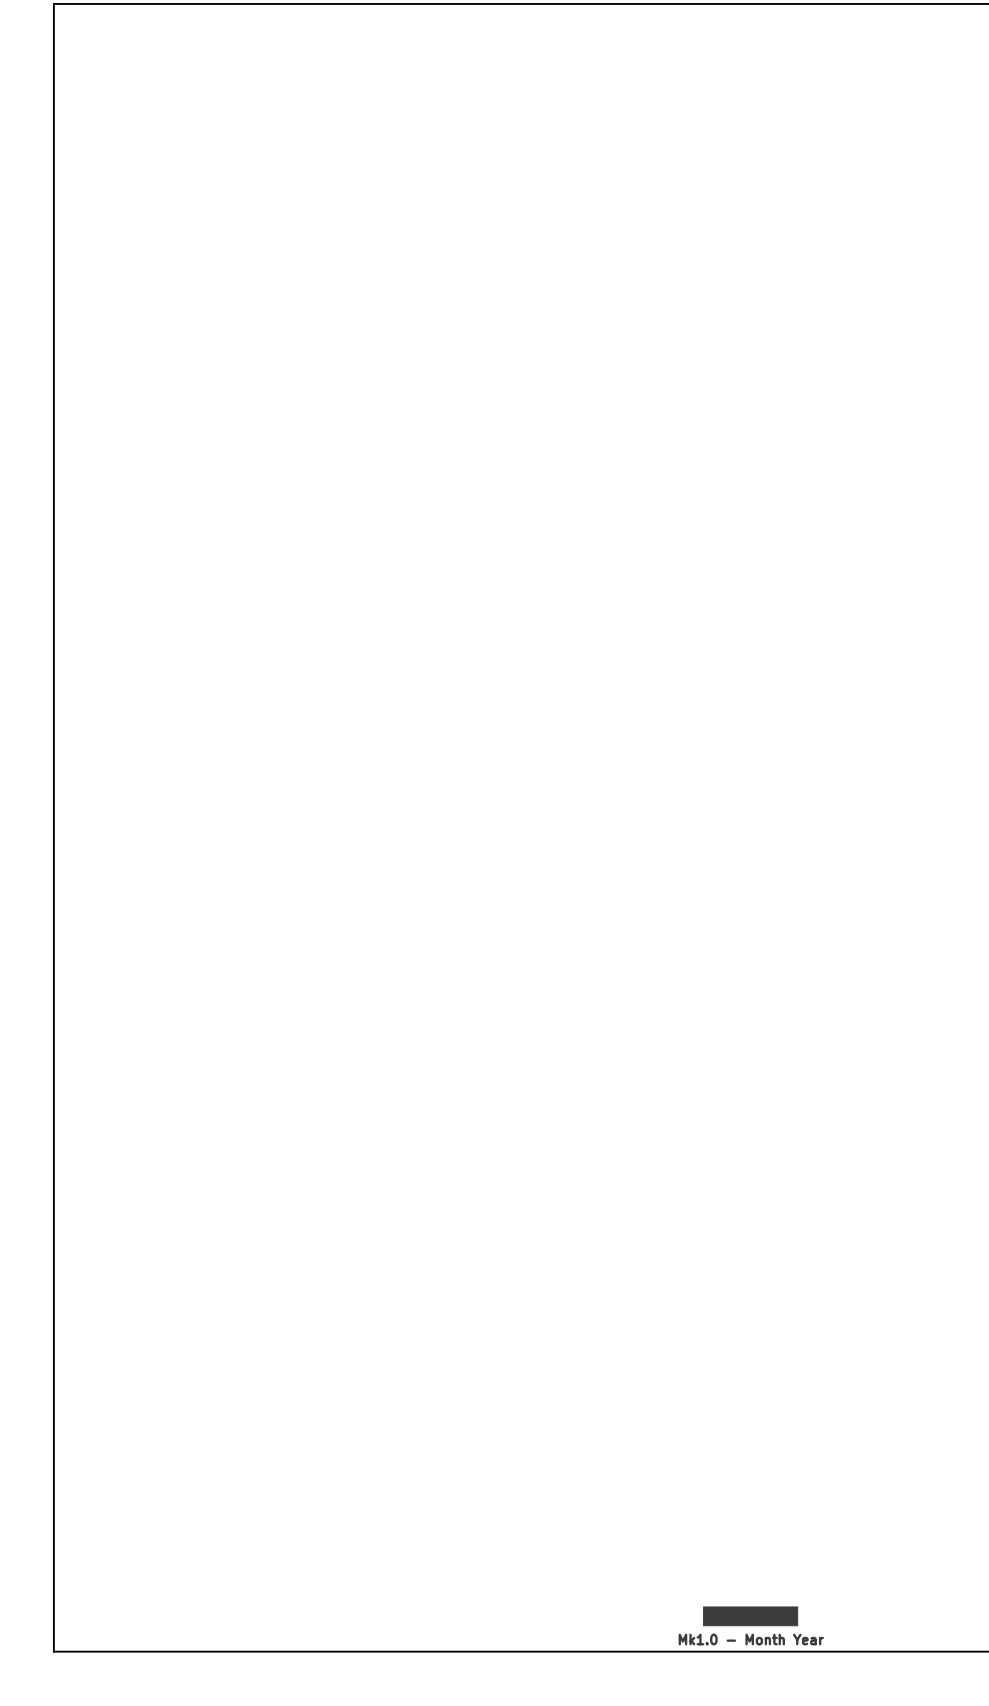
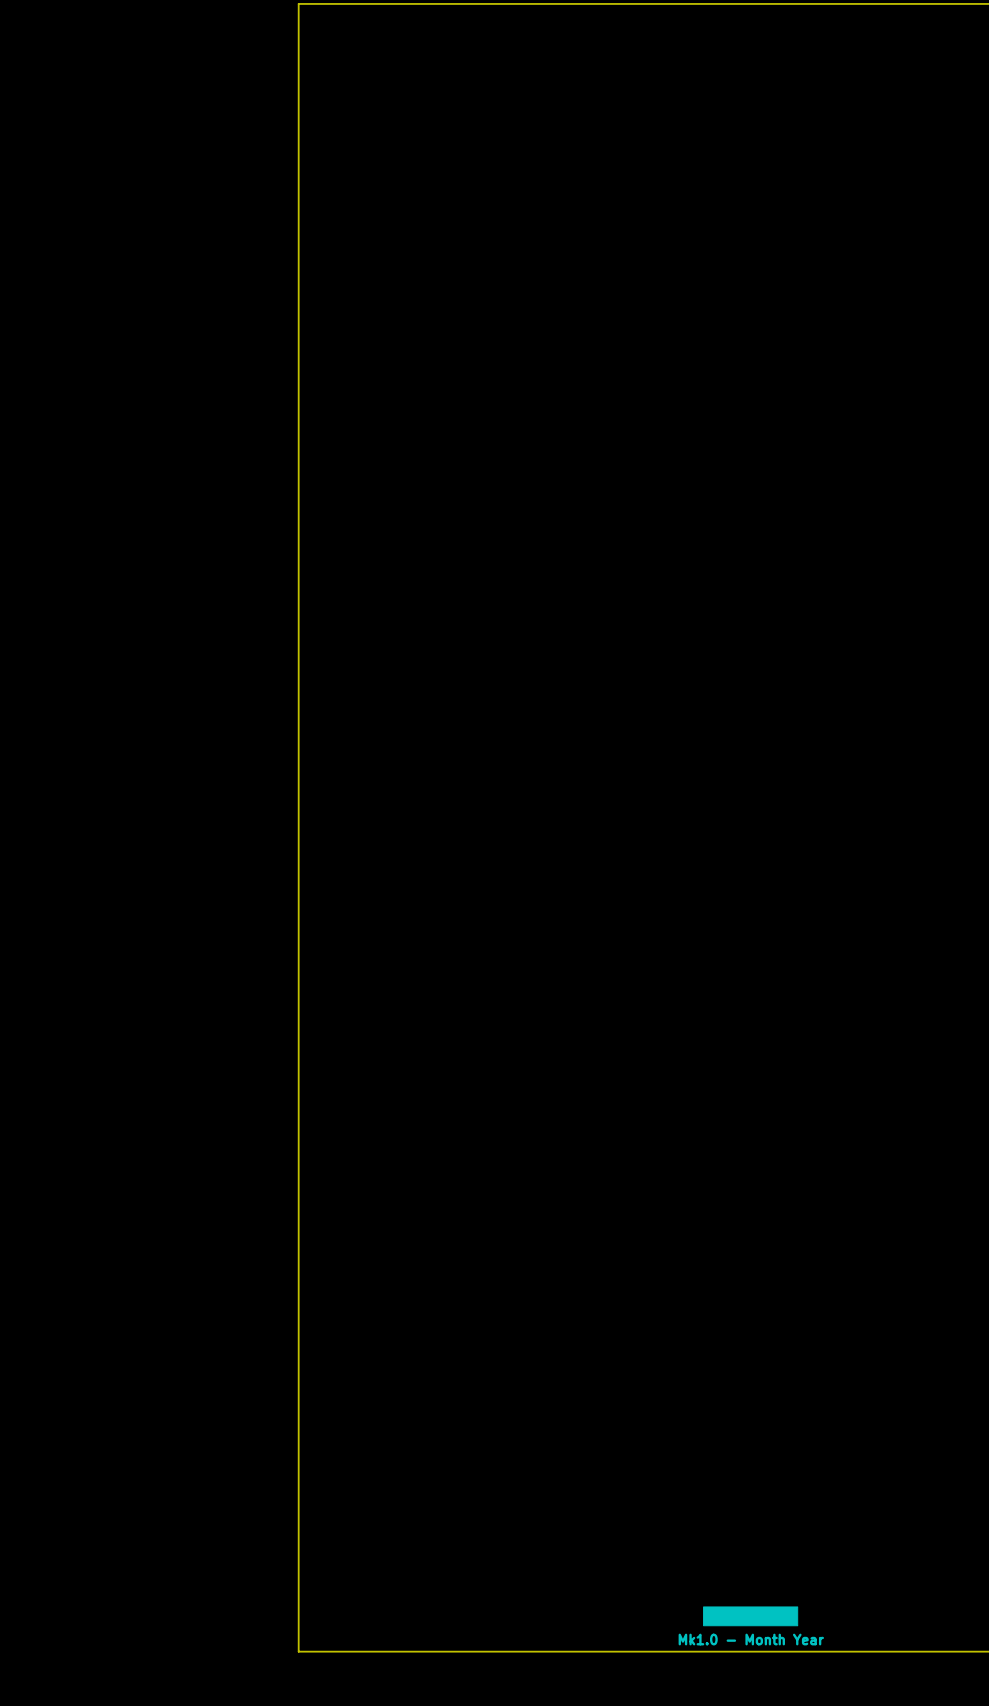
board edge: (298, 3) (53, 3) (53, 1651) (298, 1651) -> (298, 3) (298, 1651)

